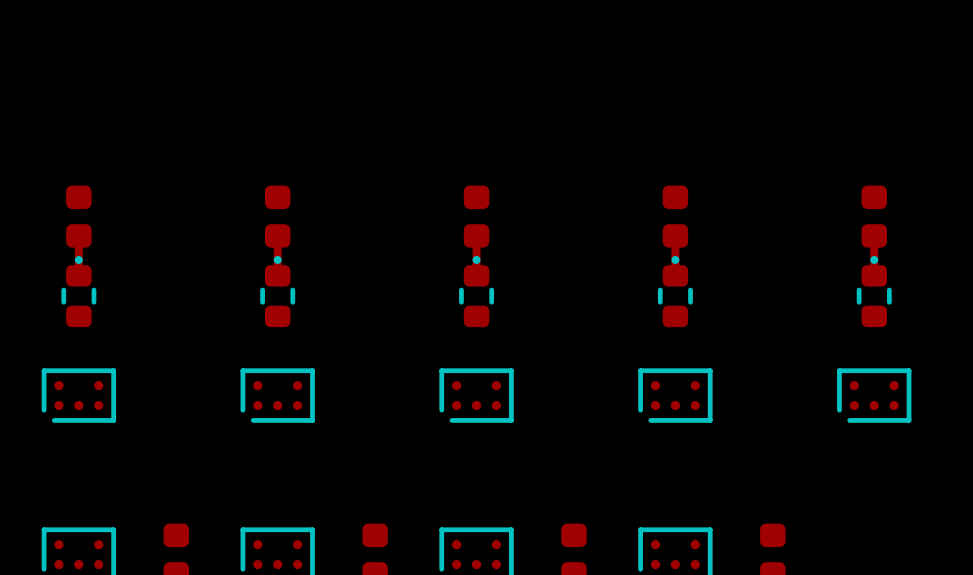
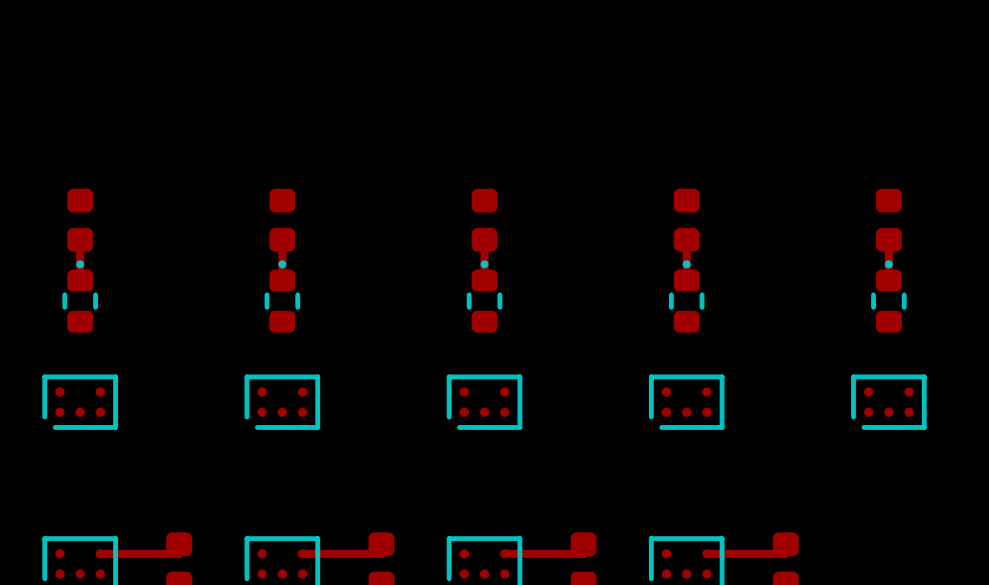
top track: none -> (179, 544) (179, 553) (100, 553)
top track: none -> (381, 544) (381, 553) (302, 553)
top track: none -> (583, 544) (583, 553) (504, 553)
top track: none -> (785, 544) (785, 553) (706, 553)

